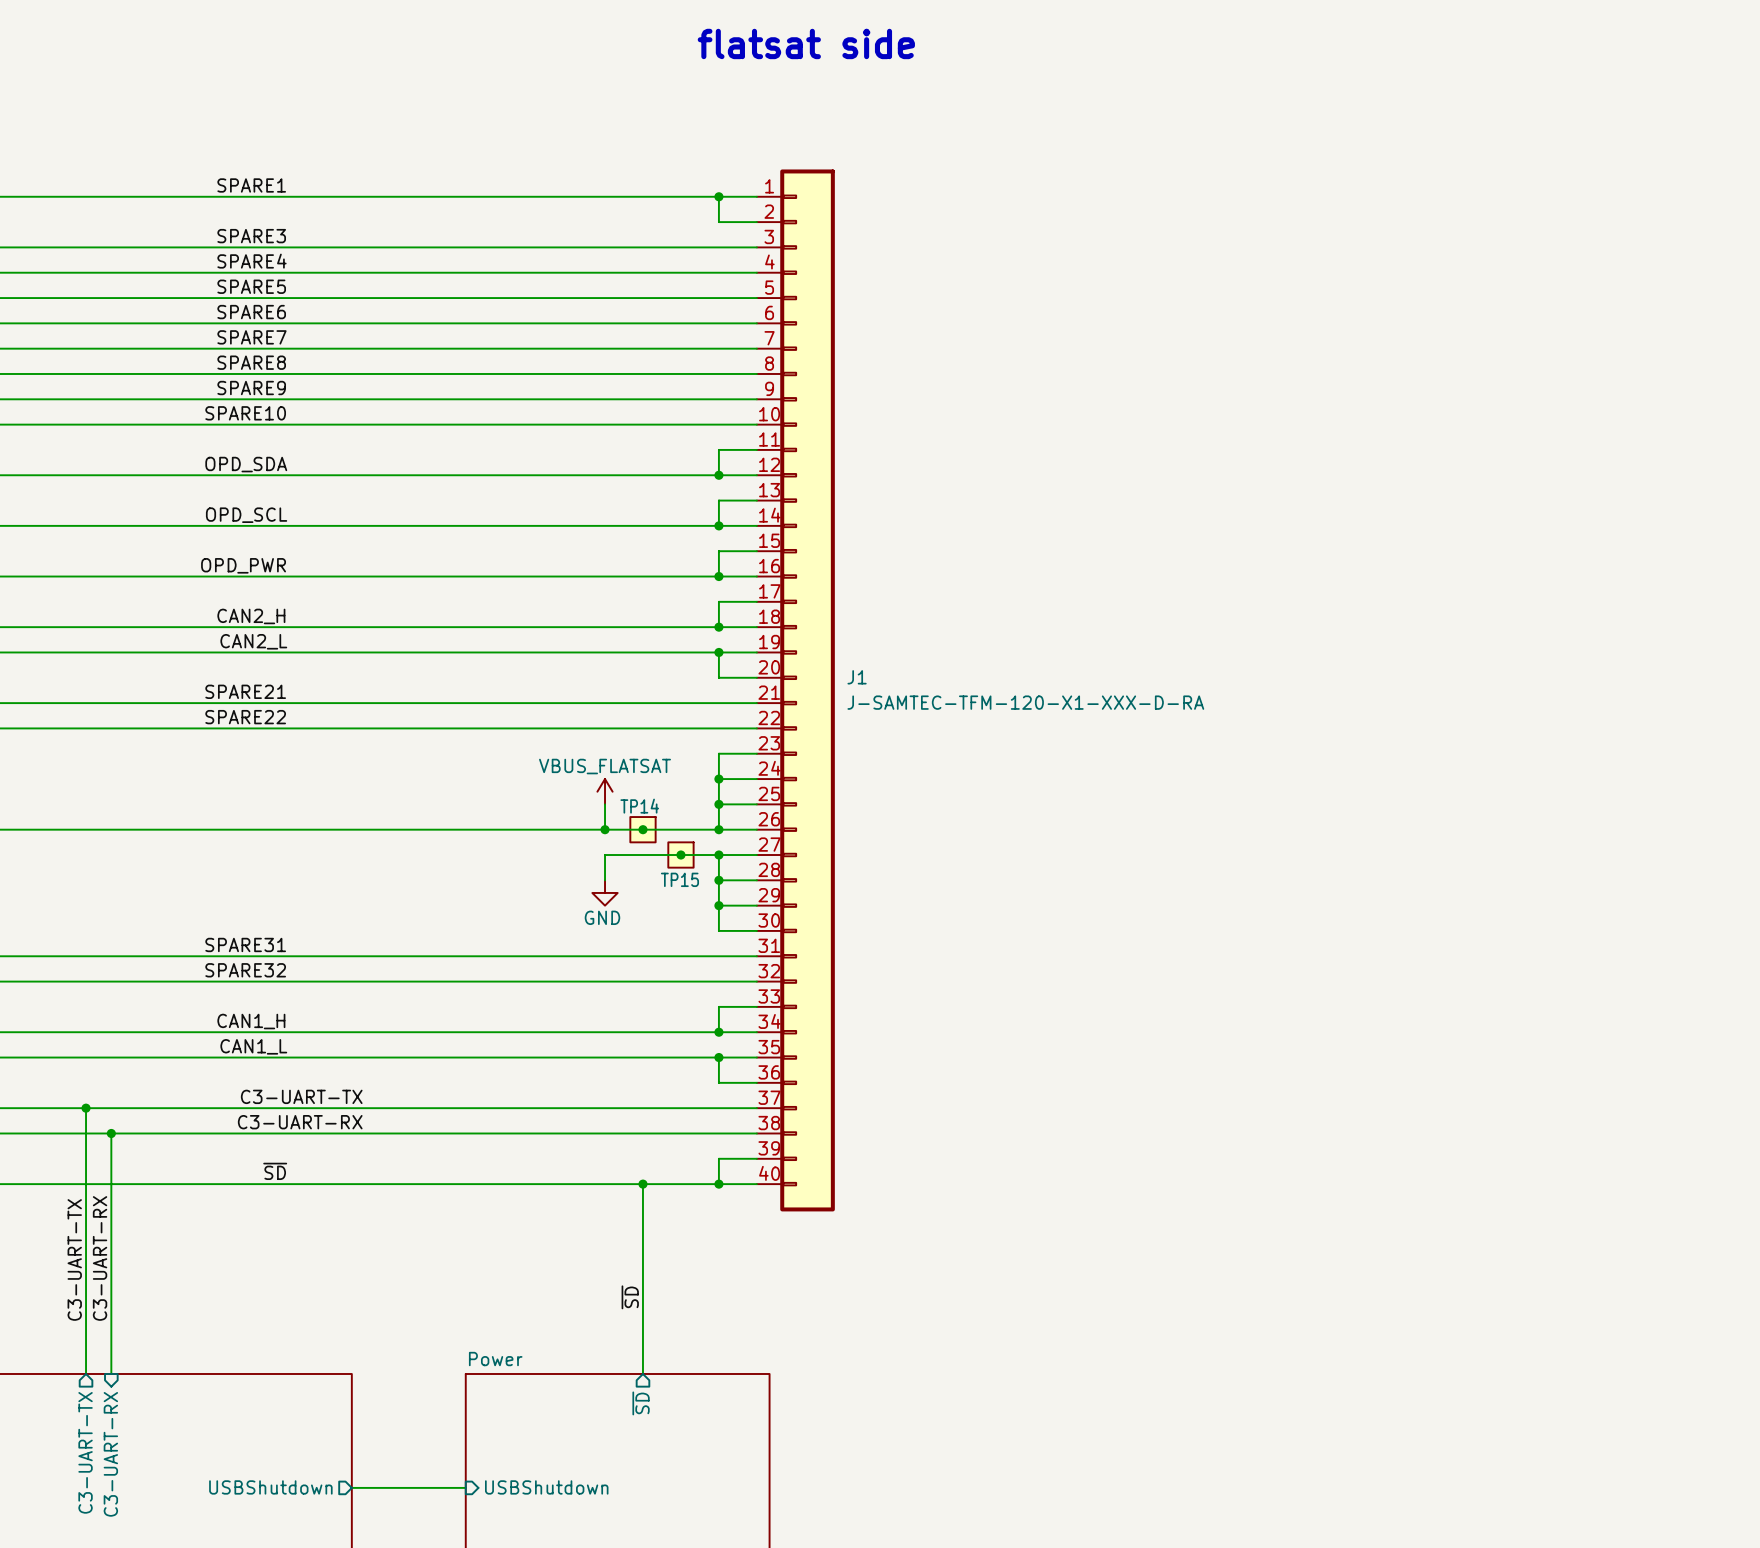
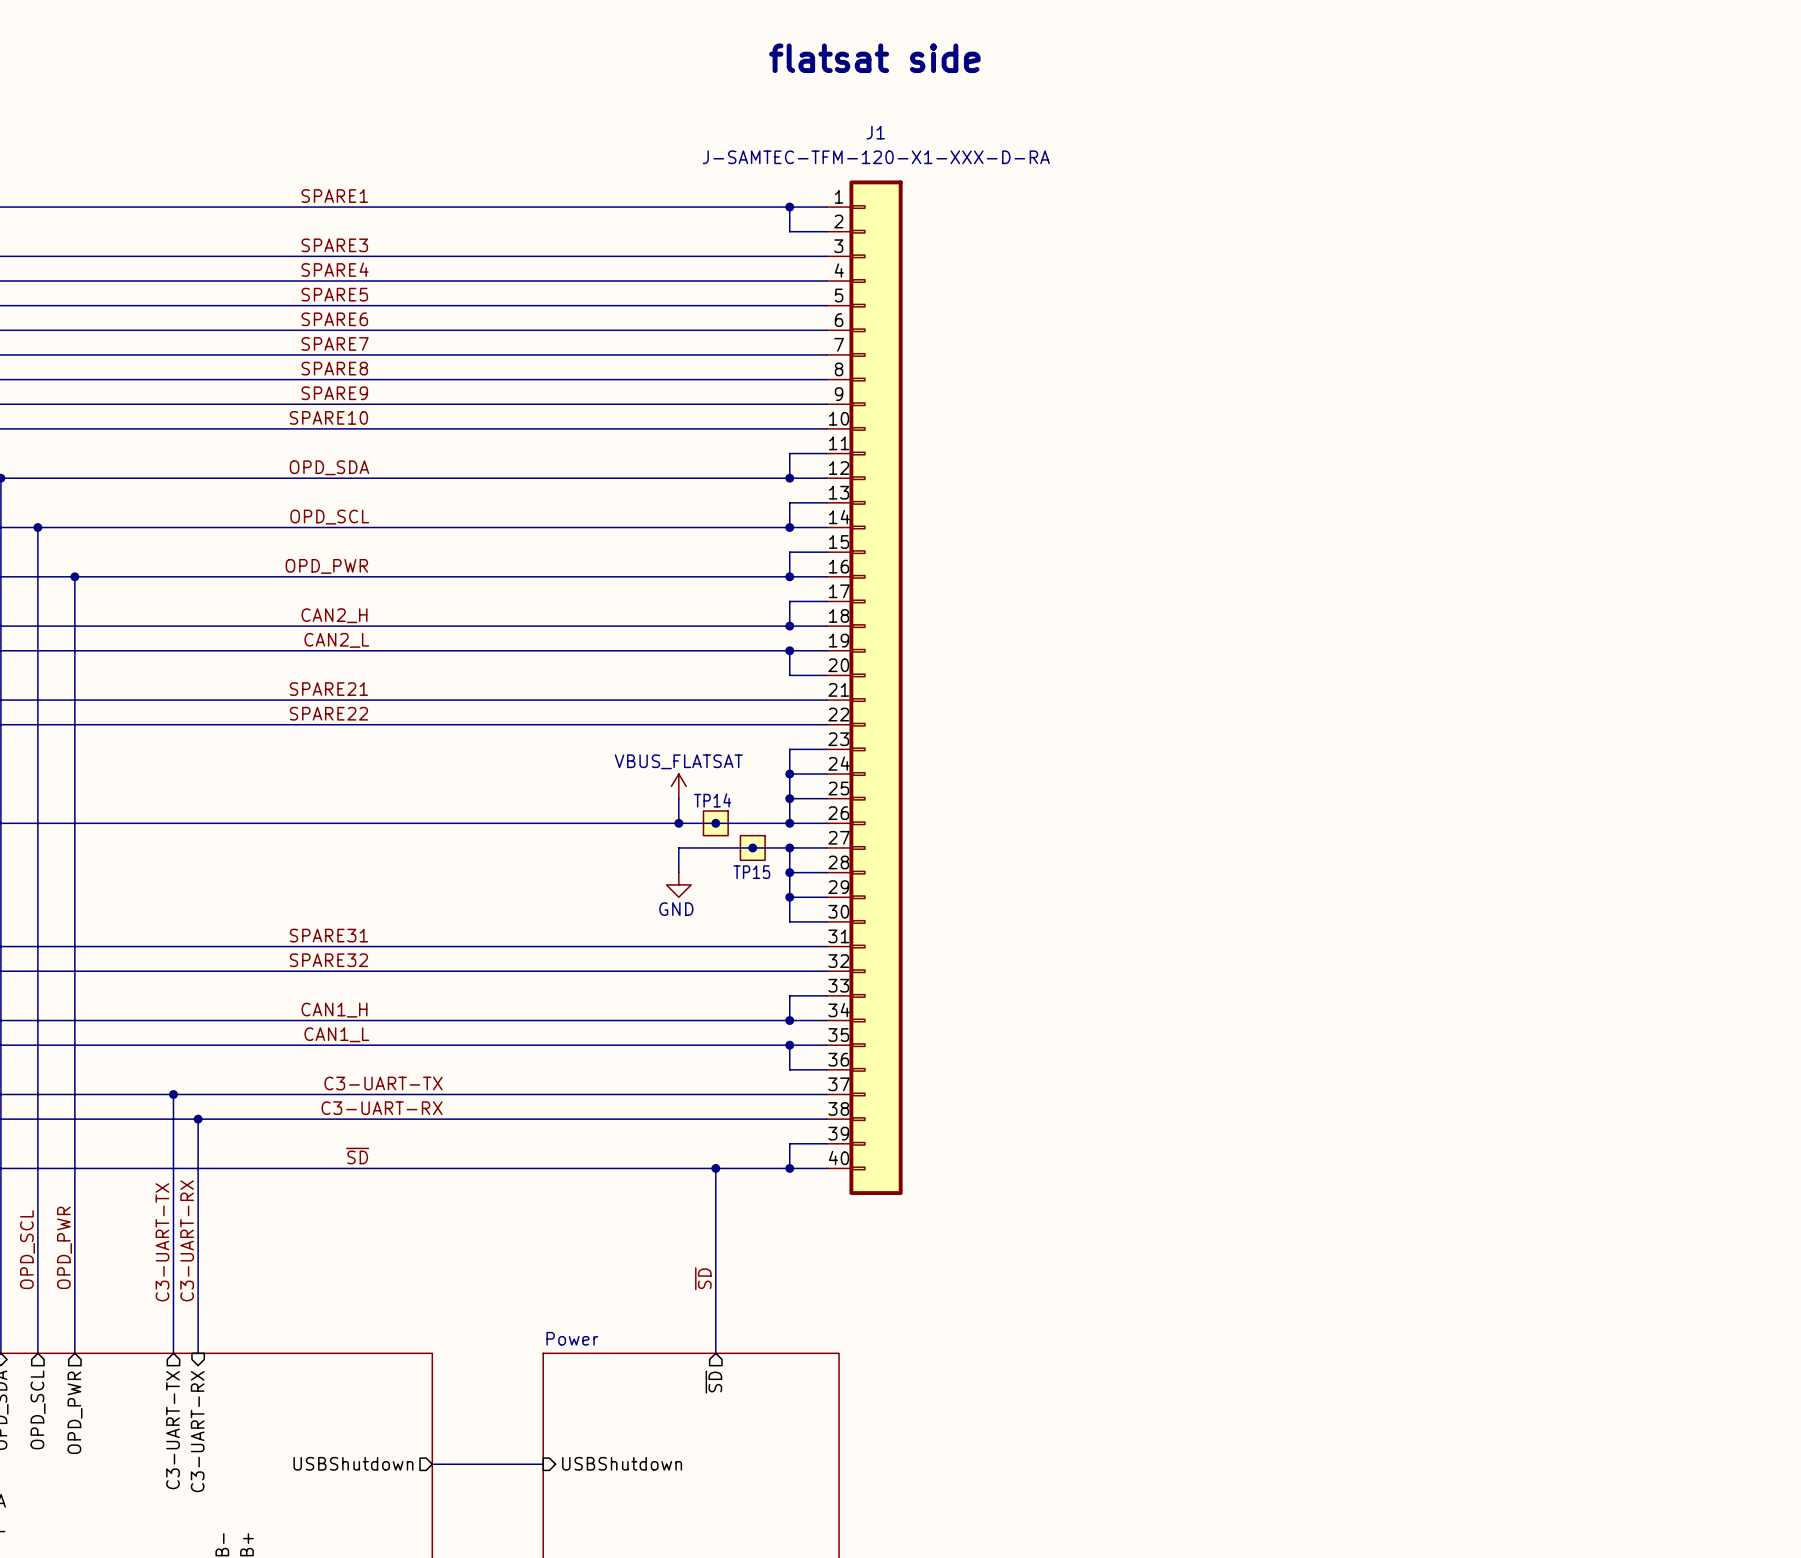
J1 name position: J1 (857, 677) -> J1 (875, 132)
J1 value position: J-SAMTEC-TFM-120-X1-XXX-D-RA (1025, 702) -> J-SAMTEC-TFM-120-X1-XXX-D-RA (876, 157)

